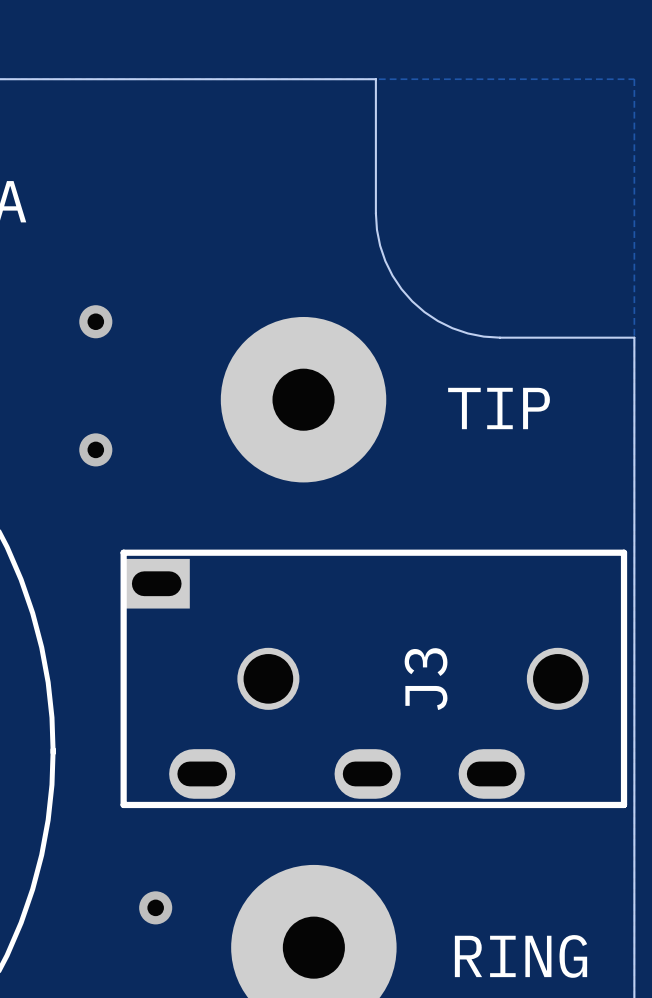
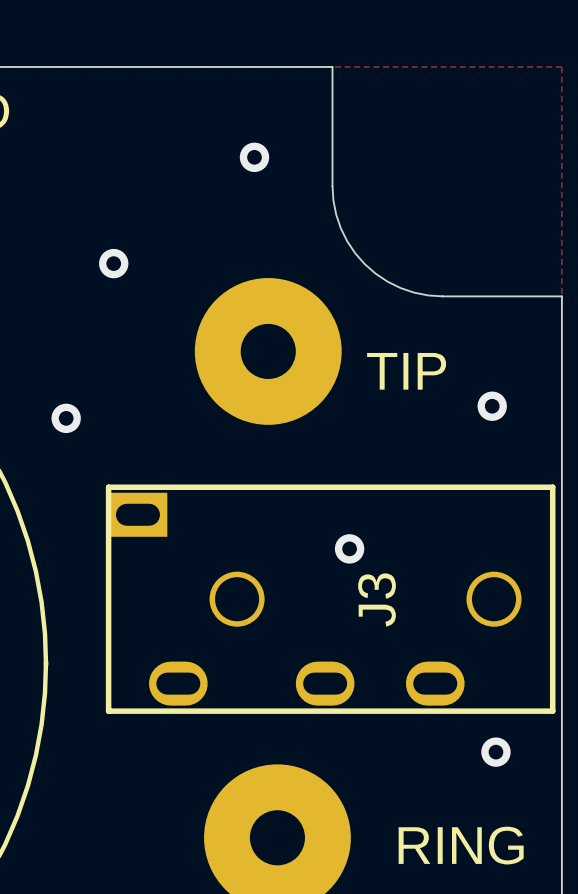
via: none -> (254, 157)
via position: (95, 321) -> (113, 263)
text position: TIP (499, 408) -> TIP (406, 371)
via position: (95, 449) -> (66, 418)
via: none -> (492, 406)
via: none -> (349, 548)
via: none -> (495, 752)
via: (155, 907) -> none

